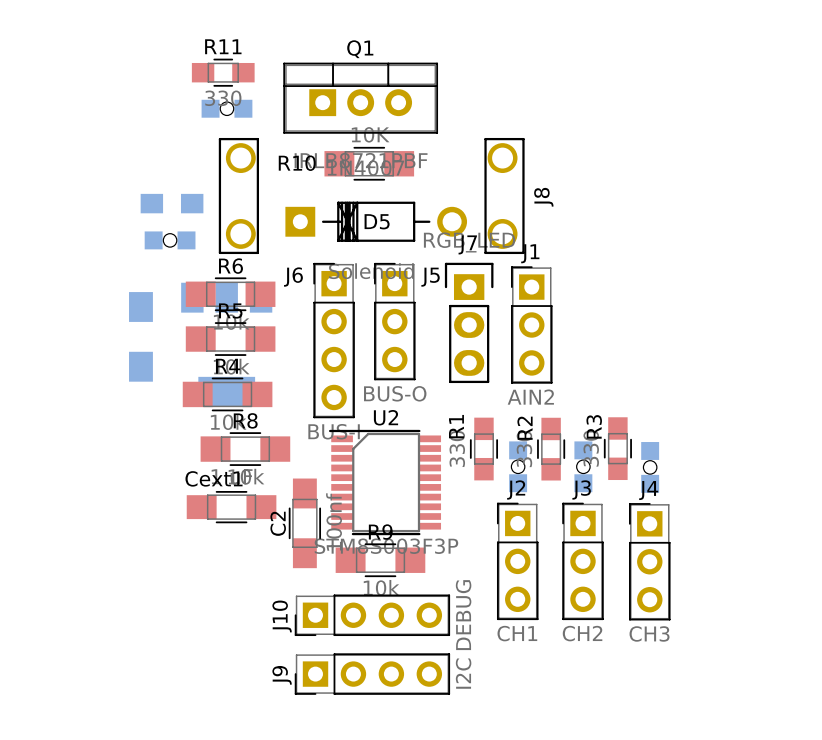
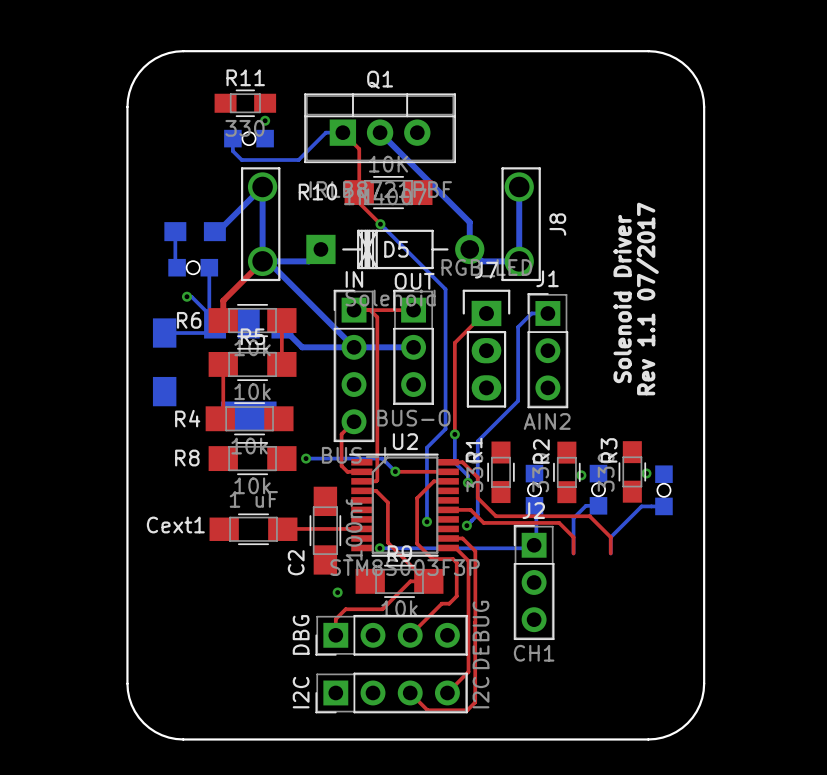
board edge: none -> (183, 51) (648, 51) (669, 55) (682, 62) (692, 73) (702, 92) (704, 106) (704, 683) (702, 698) (696, 711) (682, 727) (669, 735) (648, 739) (183, 739) (161, 735) (149, 727) (138, 717) (129, 698) (127, 683) (127, 99) (134, 79) (143, 67) (161, 55) (183, 51)
via: none -> (265, 120)
bottom track: none -> (342, 132) (325, 132) (298, 160) (241, 160) (232, 151) (232, 138)
top track: none -> (342, 132) (359, 149) (359, 202) (380, 224)
bottom track: none -> (380, 132) (469, 222) (469, 249) (481, 261) (519, 261) (519, 186)
bottom track: none -> (380, 224) (445, 289) (445, 429) (426, 447) (426, 521)
via: none -> (380, 224)
bottom track: none -> (175, 231) (175, 265) (177, 267)
bottom track: none -> (214, 231) (217, 231) (262, 186) (262, 261) (308, 261) (320, 249)
top track: none -> (262, 261) (223, 300) (223, 320)
bottom track: none -> (268, 261) (354, 347)
bottom track: none -> (209, 267) (209, 318) (215, 323)
R6 name position: R6 (230, 266) -> R6 (189, 320)
bottom track: none -> (186, 296) (191, 296) (215, 320) (215, 323)
via: none -> (186, 296)
text: none -> Solenoid Driver (622, 299)
text: none -> Rev 1.1 07/2017 (647, 299)
J6 name: J6 (293, 277) -> IN (354, 279)
J5 name: J5 (430, 277) -> OUT (414, 281)
top track: none -> (354, 310) (413, 310)
top track: none -> (370, 310) (377, 317) (377, 480) (361, 481)
top track: none -> (486, 313) (484, 313) (454, 342) (454, 434)
bottom track: none -> (547, 313) (531, 313) (518, 327) (518, 400) (477, 441) (477, 514) (466, 525)
top track: none -> (281, 320) (281, 364)
bottom track: none -> (215, 323) (205, 333) (164, 333)
bottom track: none -> (282, 323) (282, 327) (302, 347) (413, 347)
top track: none -> (223, 364) (223, 415) (220, 418)
R4 name position: R4 (228, 366) -> R4 (187, 418)
top track: none -> (354, 421) (341, 434) (341, 465) (347, 471) (361, 471)
bottom track: none -> (454, 434) (454, 462) (467, 475) (467, 482)
via: none -> (454, 434)
R8 name position: R8 (245, 420) -> R8 (187, 458)
bottom track: none -> (306, 458) (382, 458) (395, 471)
via: none -> (306, 458)
top track: none -> (448, 462) (462, 462) (477, 477) (477, 498) (495, 516) (589, 516) (610, 537) (610, 553)
top track: none -> (395, 471) (448, 471)
via: none -> (395, 471)
R8 position: (245, 449) -> (252, 458)
via: none -> (646, 473)
via: none -> (581, 475)
top track: none -> (448, 481) (433, 481) (417, 498) (417, 543) (432, 559) (453, 559) (456, 562) (456, 596) (449, 603) (441, 603) (410, 635)
via: none -> (467, 482)
top track: none -> (361, 490) (376, 490) (387, 502) (387, 542) (426, 581)
Cext1 name position: Cext1 (214, 478) -> Cext1 (175, 525)
bottom track: none -> (534, 506) (536, 507) (536, 553) (531, 548) (379, 548)
bottom track: none -> (598, 506) (585, 505) (573, 518) (573, 553)
bottom track: none -> (663, 506) (641, 506) (610, 537) (610, 553)
top track: none -> (448, 509) (470, 509) (483, 522) (559, 522) (573, 537) (573, 553)
via: none -> (426, 521)
via: none -> (466, 525)
top track: none -> (361, 528) (282, 529)
top track: none -> (448, 538) (462, 538) (475, 551) (475, 622)
C2 name position: C2 (278, 523) -> C2 (296, 562)
C2 position: (304, 523) -> (325, 530)
via: none -> (379, 548)
top track: none -> (448, 547) (455, 547) (468, 560) (468, 671) (447, 692)
top track: none -> (428, 581) (410, 581) (382, 609) (345, 609) (335, 619) (335, 635)
J3: CH2 (582, 561) -> none
J4: CH3 (649, 561) -> none
via: none -> (337, 592)
top track: none -> (475, 622) (475, 702) (467, 710) (427, 710) (410, 692)
J10 name: J10 (282, 616) -> DBG (301, 634)
J9 name: J9 (282, 675) -> I2C (301, 692)

